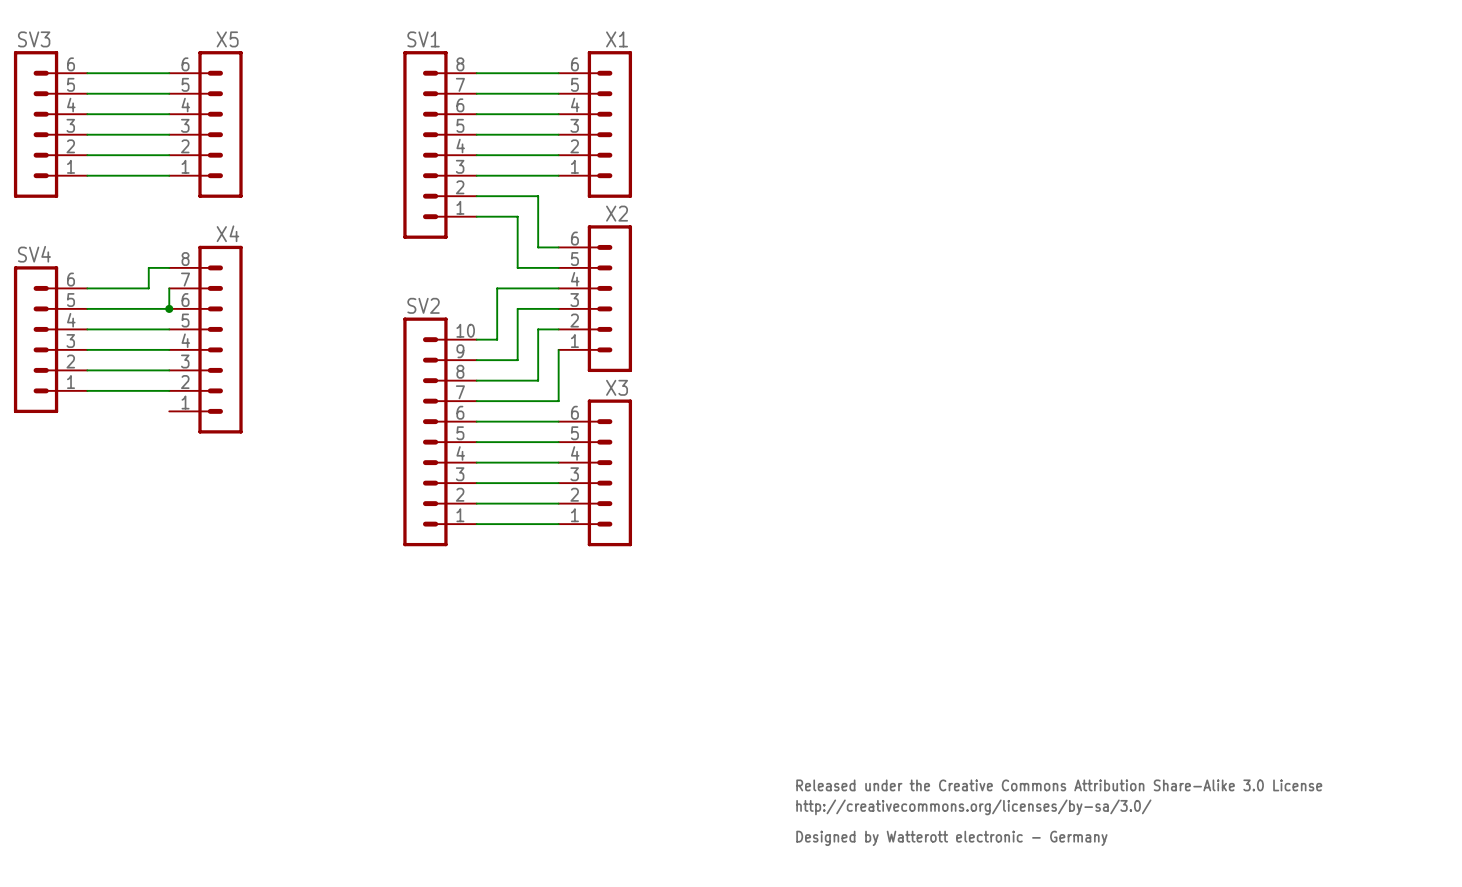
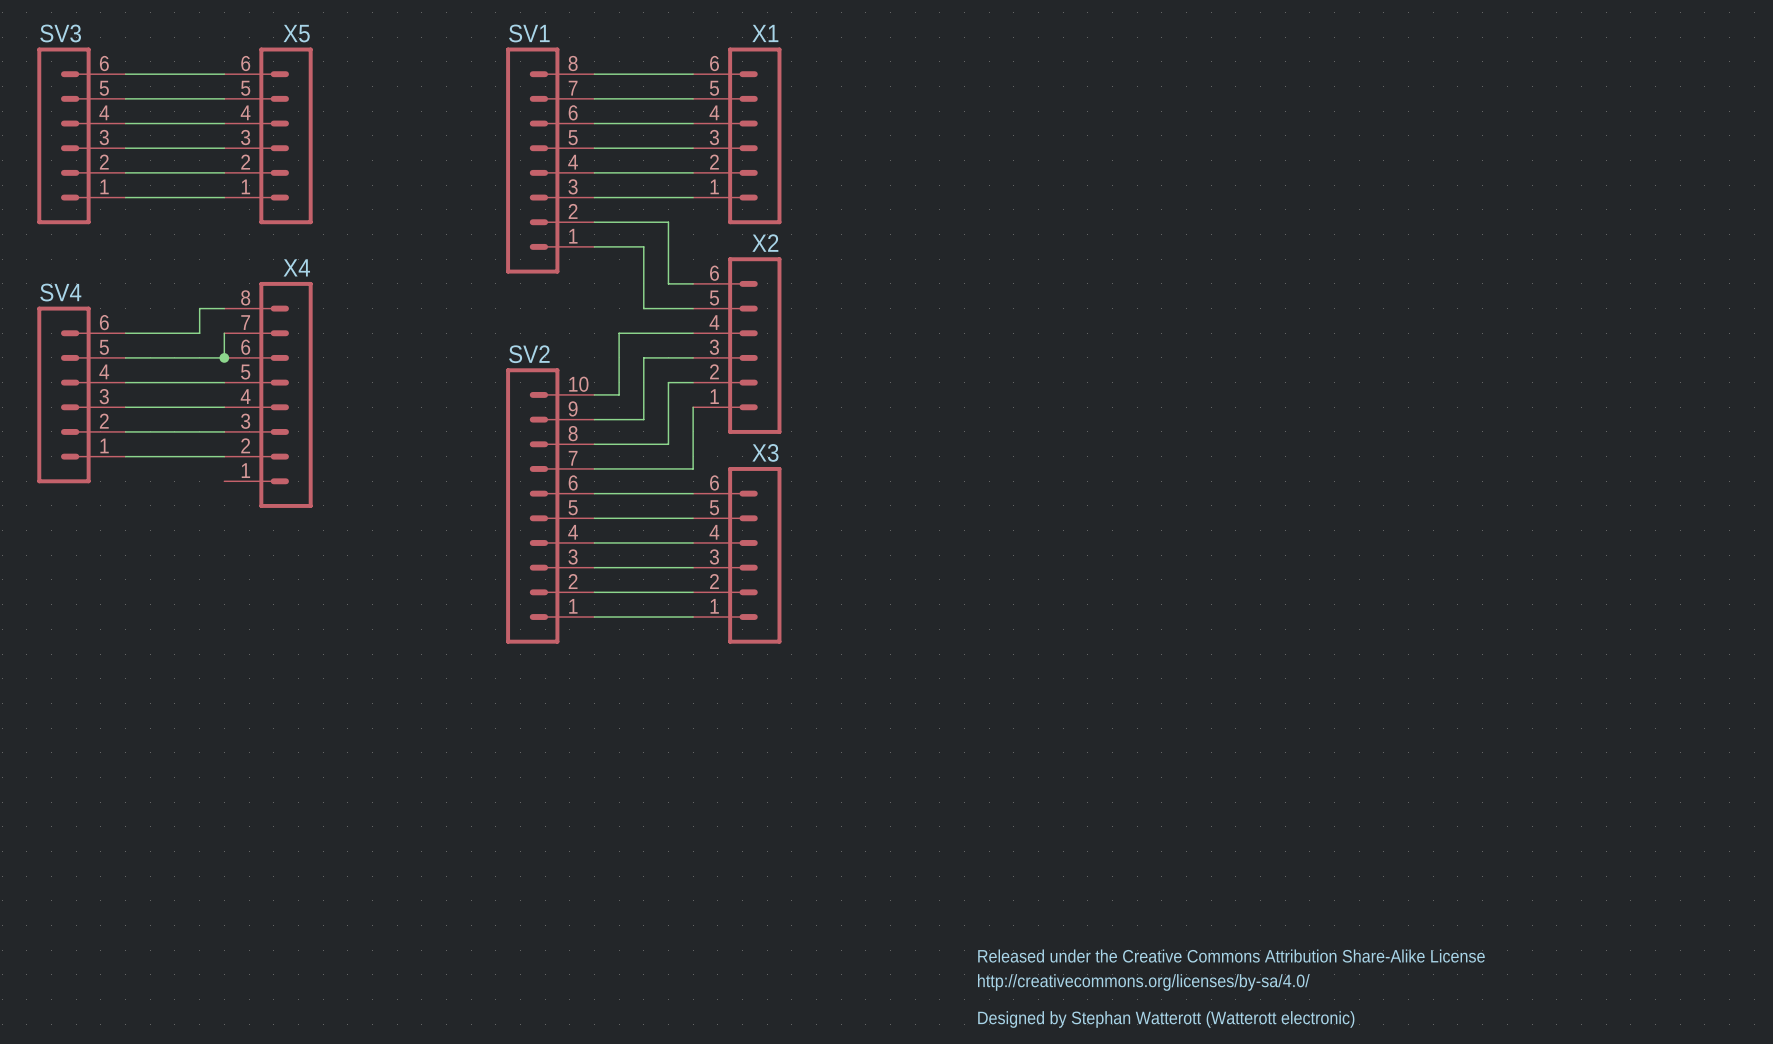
text: Released under the Creative Commons Attribution Share-Alike 3.0 License (1059, 785) -> none
text: http://creativecommons.org/licenses/by-sa/3.0/ (973, 807) -> Released under the Creative Commons Attribution Share-Alike License (1231, 956)
text: none -> http://creativecommons.org/licenses/by-sa/4.0/ (1143, 982)
text: Designed by Watterott electronic - Germany (951, 838) -> Designed by Stephan Watterott (Watterott electronic) (1166, 1019)

